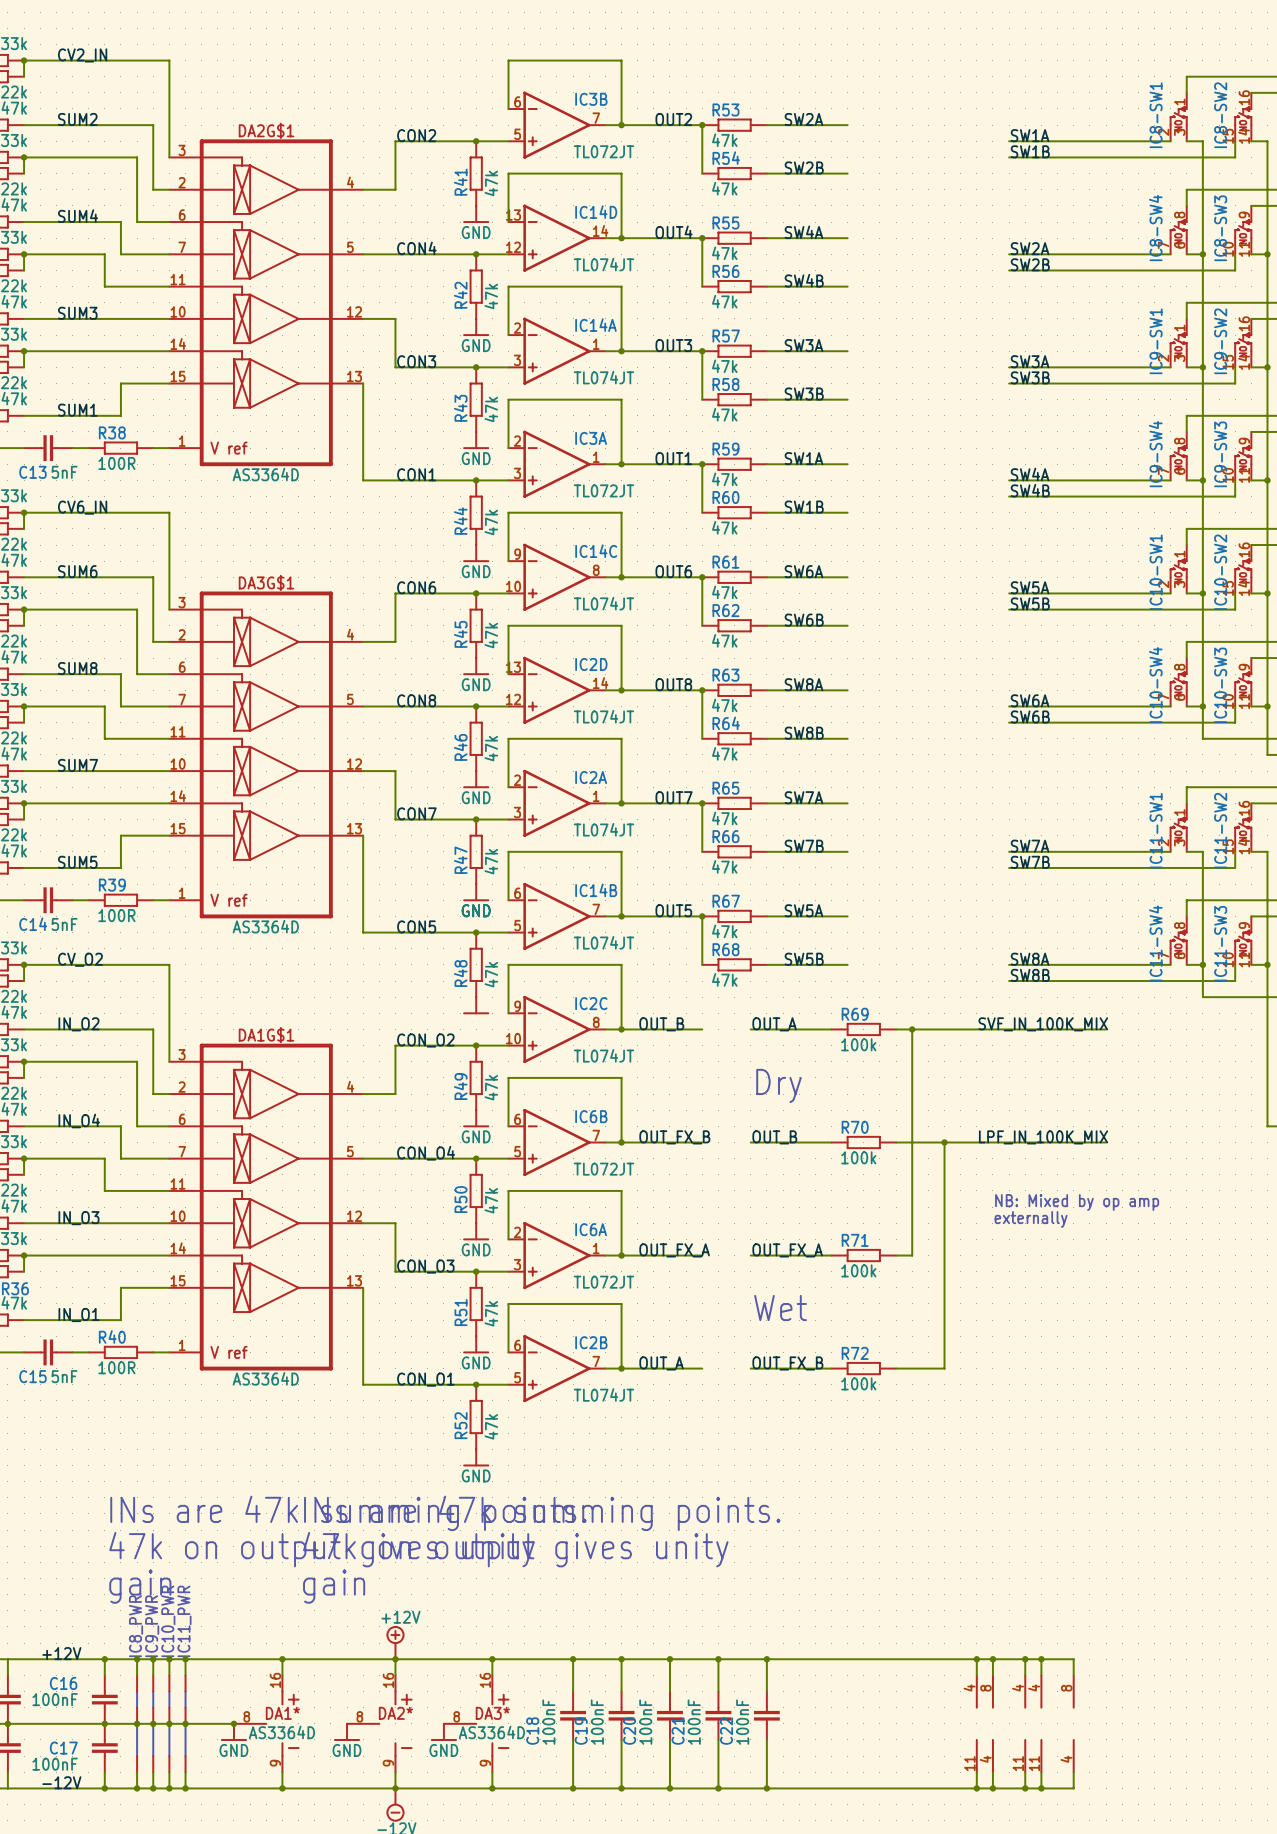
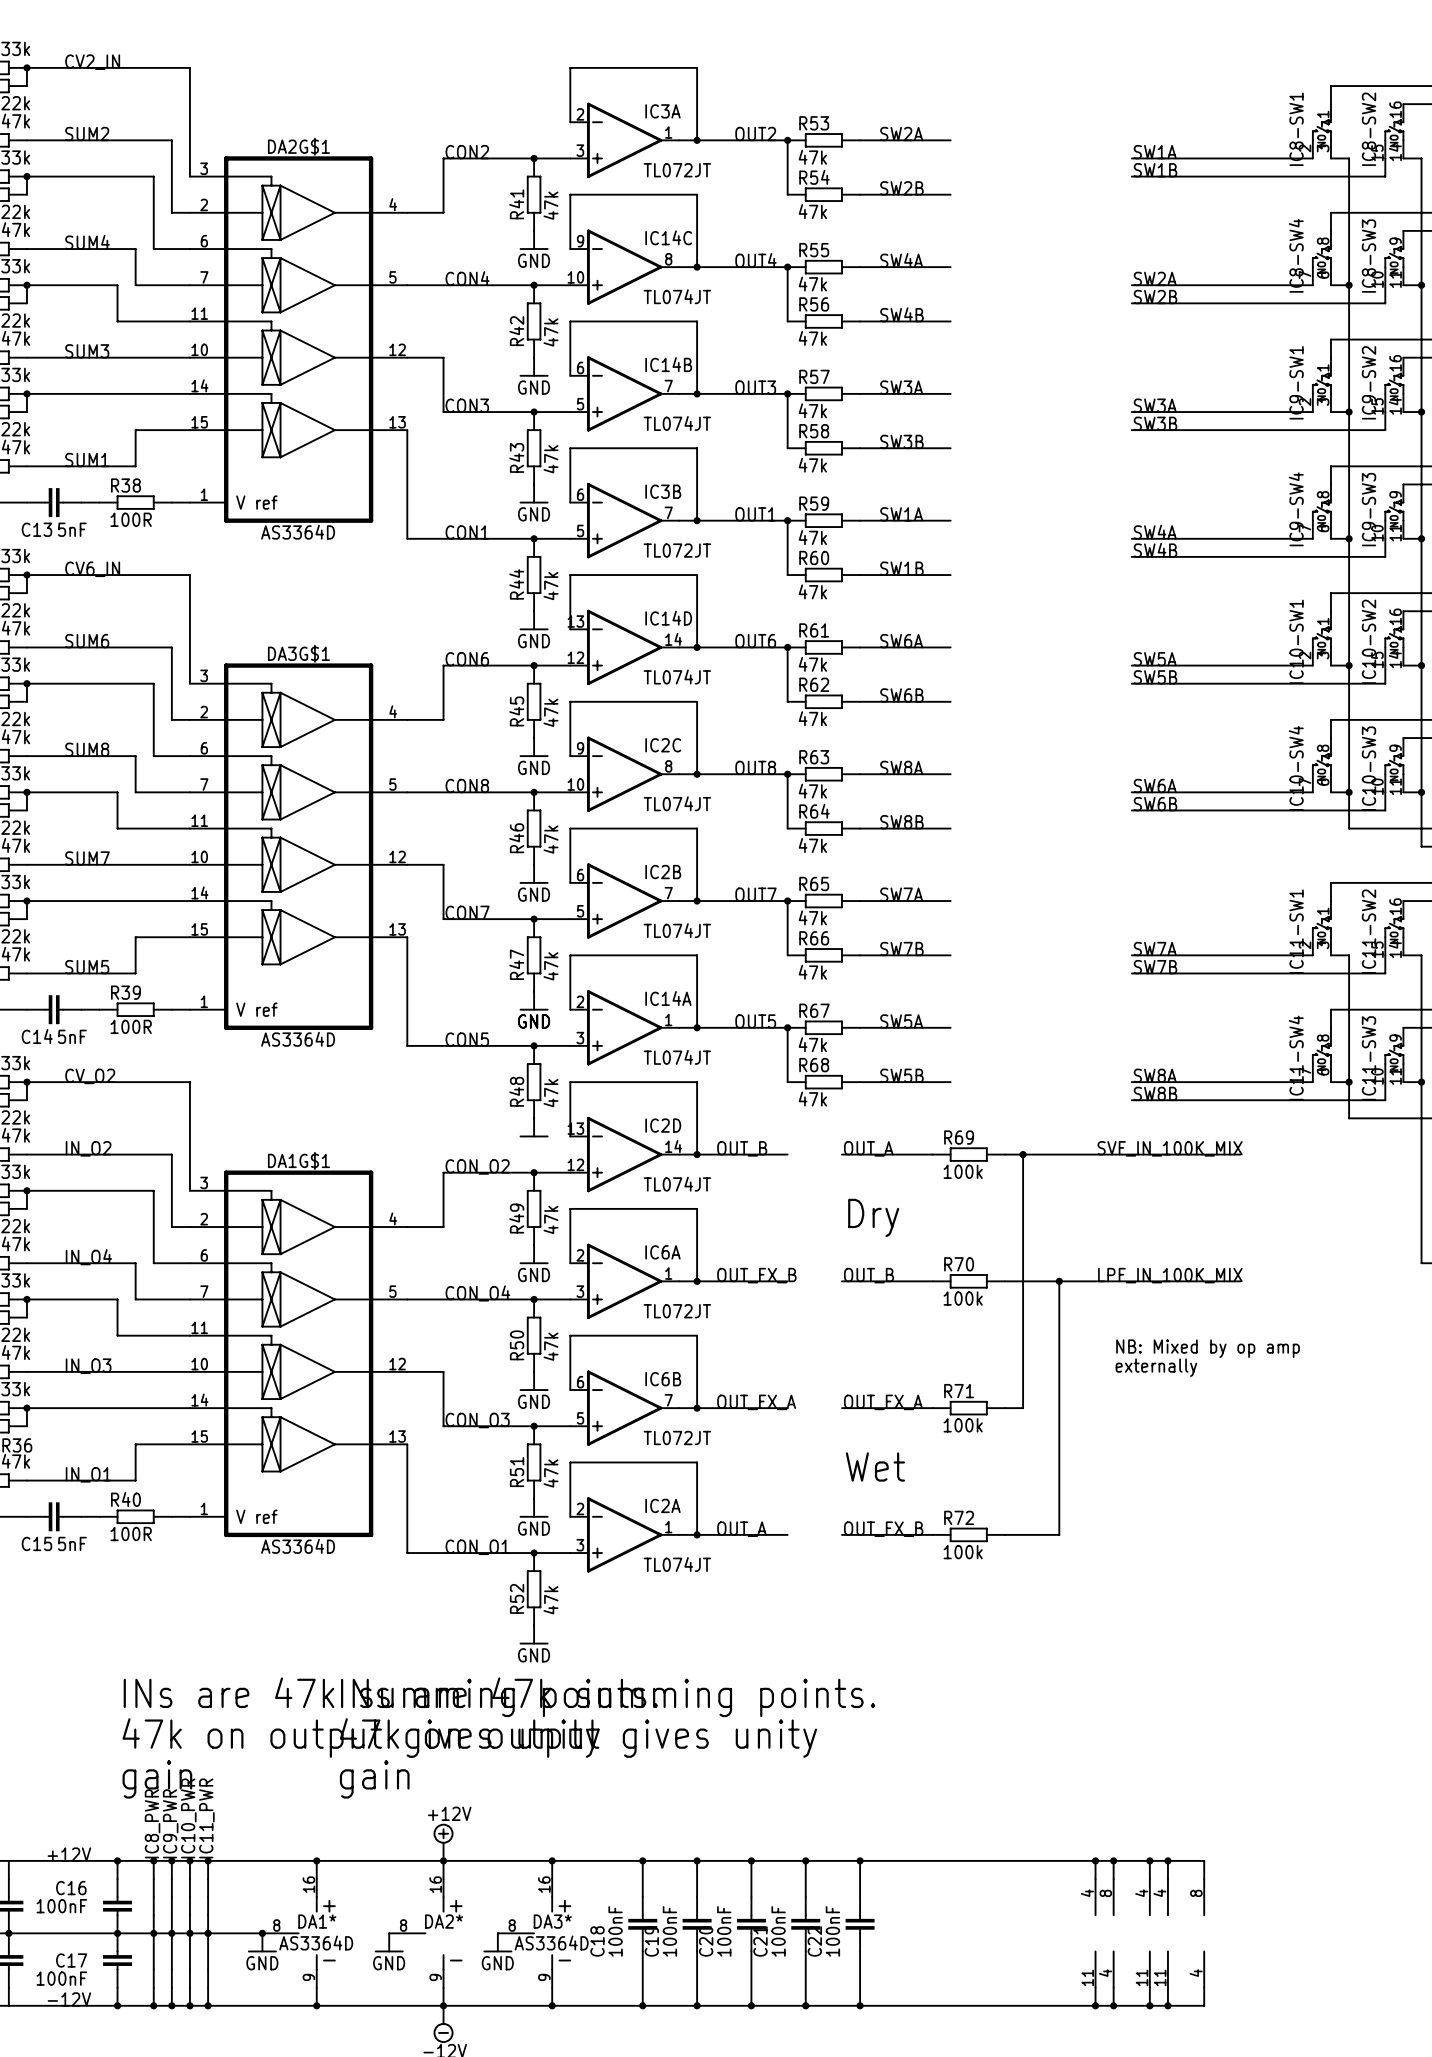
IC3B position: (556, 125) -> (624, 520)
IC14D position: (556, 238) -> (624, 647)
IC14A position: (556, 351) -> (624, 1027)
IC3A position: (556, 464) -> (624, 140)
IC14C position: (556, 577) -> (624, 267)
IC2D position: (556, 690) -> (624, 1154)
IC2A position: (556, 803) -> (624, 1534)
IC14B position: (556, 916) -> (624, 393)
IC2C position: (556, 1029) -> (624, 774)
IC6B position: (556, 1142) -> (624, 1408)
IC6A position: (556, 1255) -> (624, 1281)
IC2B position: (556, 1368) -> (624, 901)

